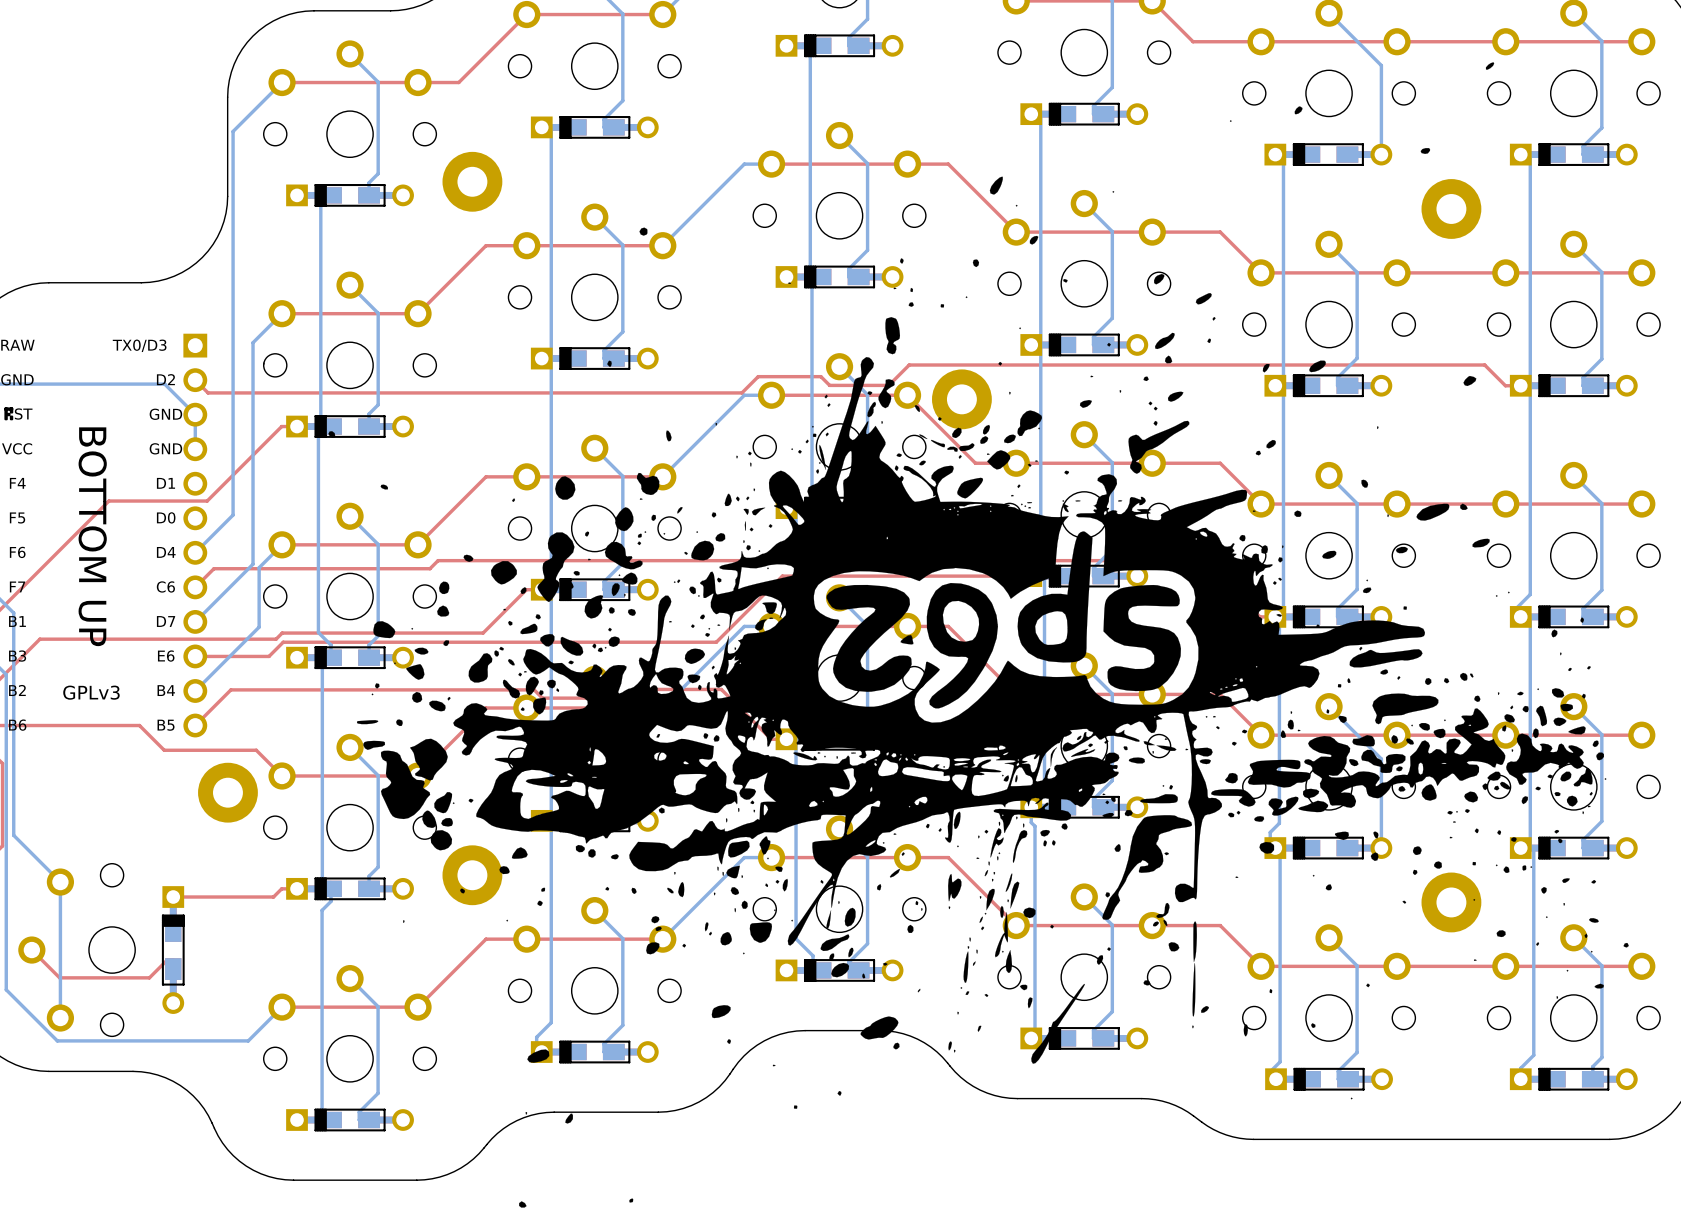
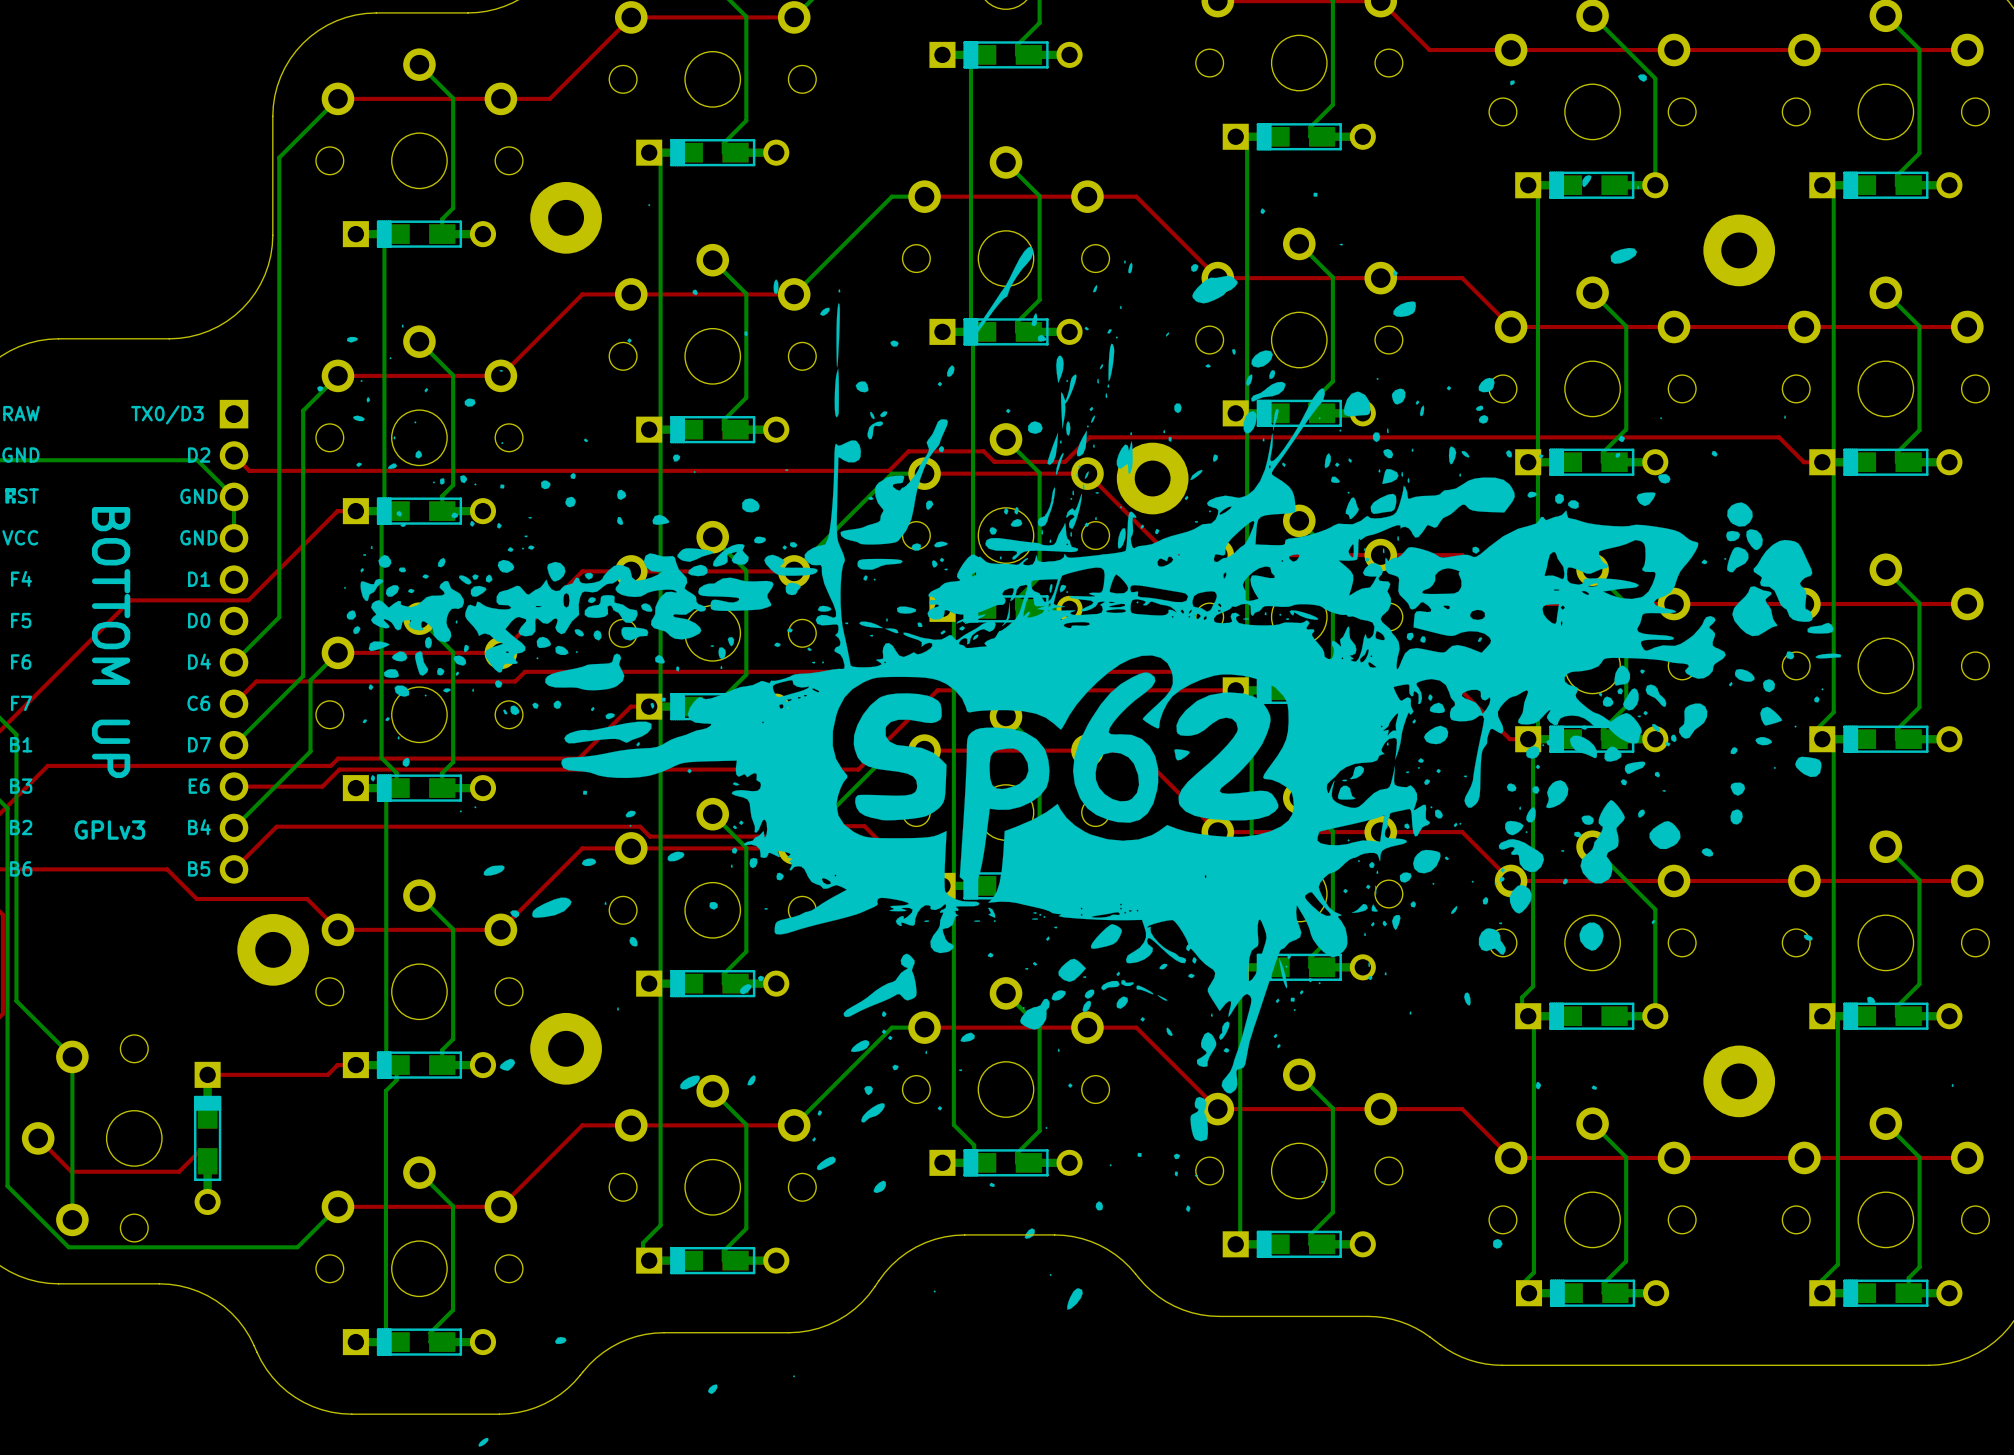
drawing shape: [263, 62, 1629, 1208] -> [317, 74, 1954, 1447]

